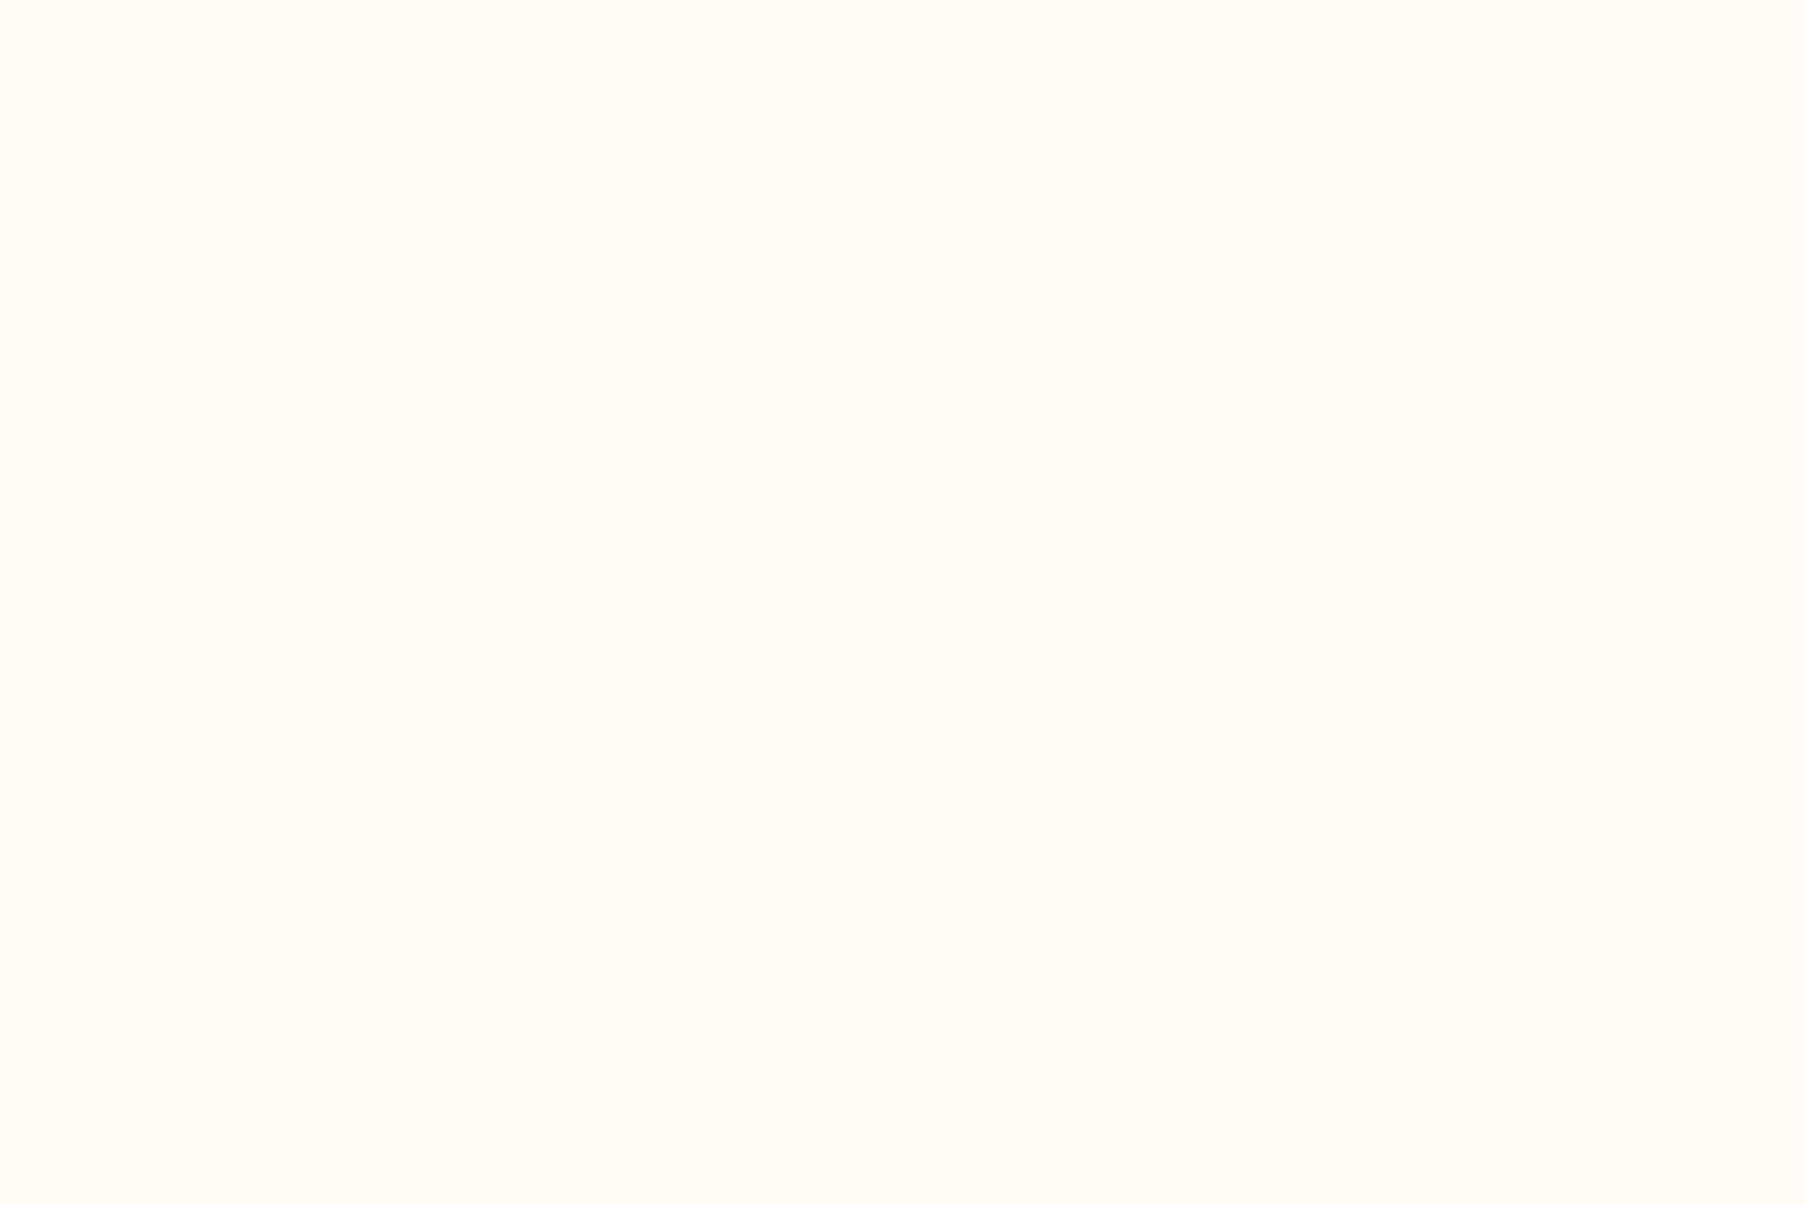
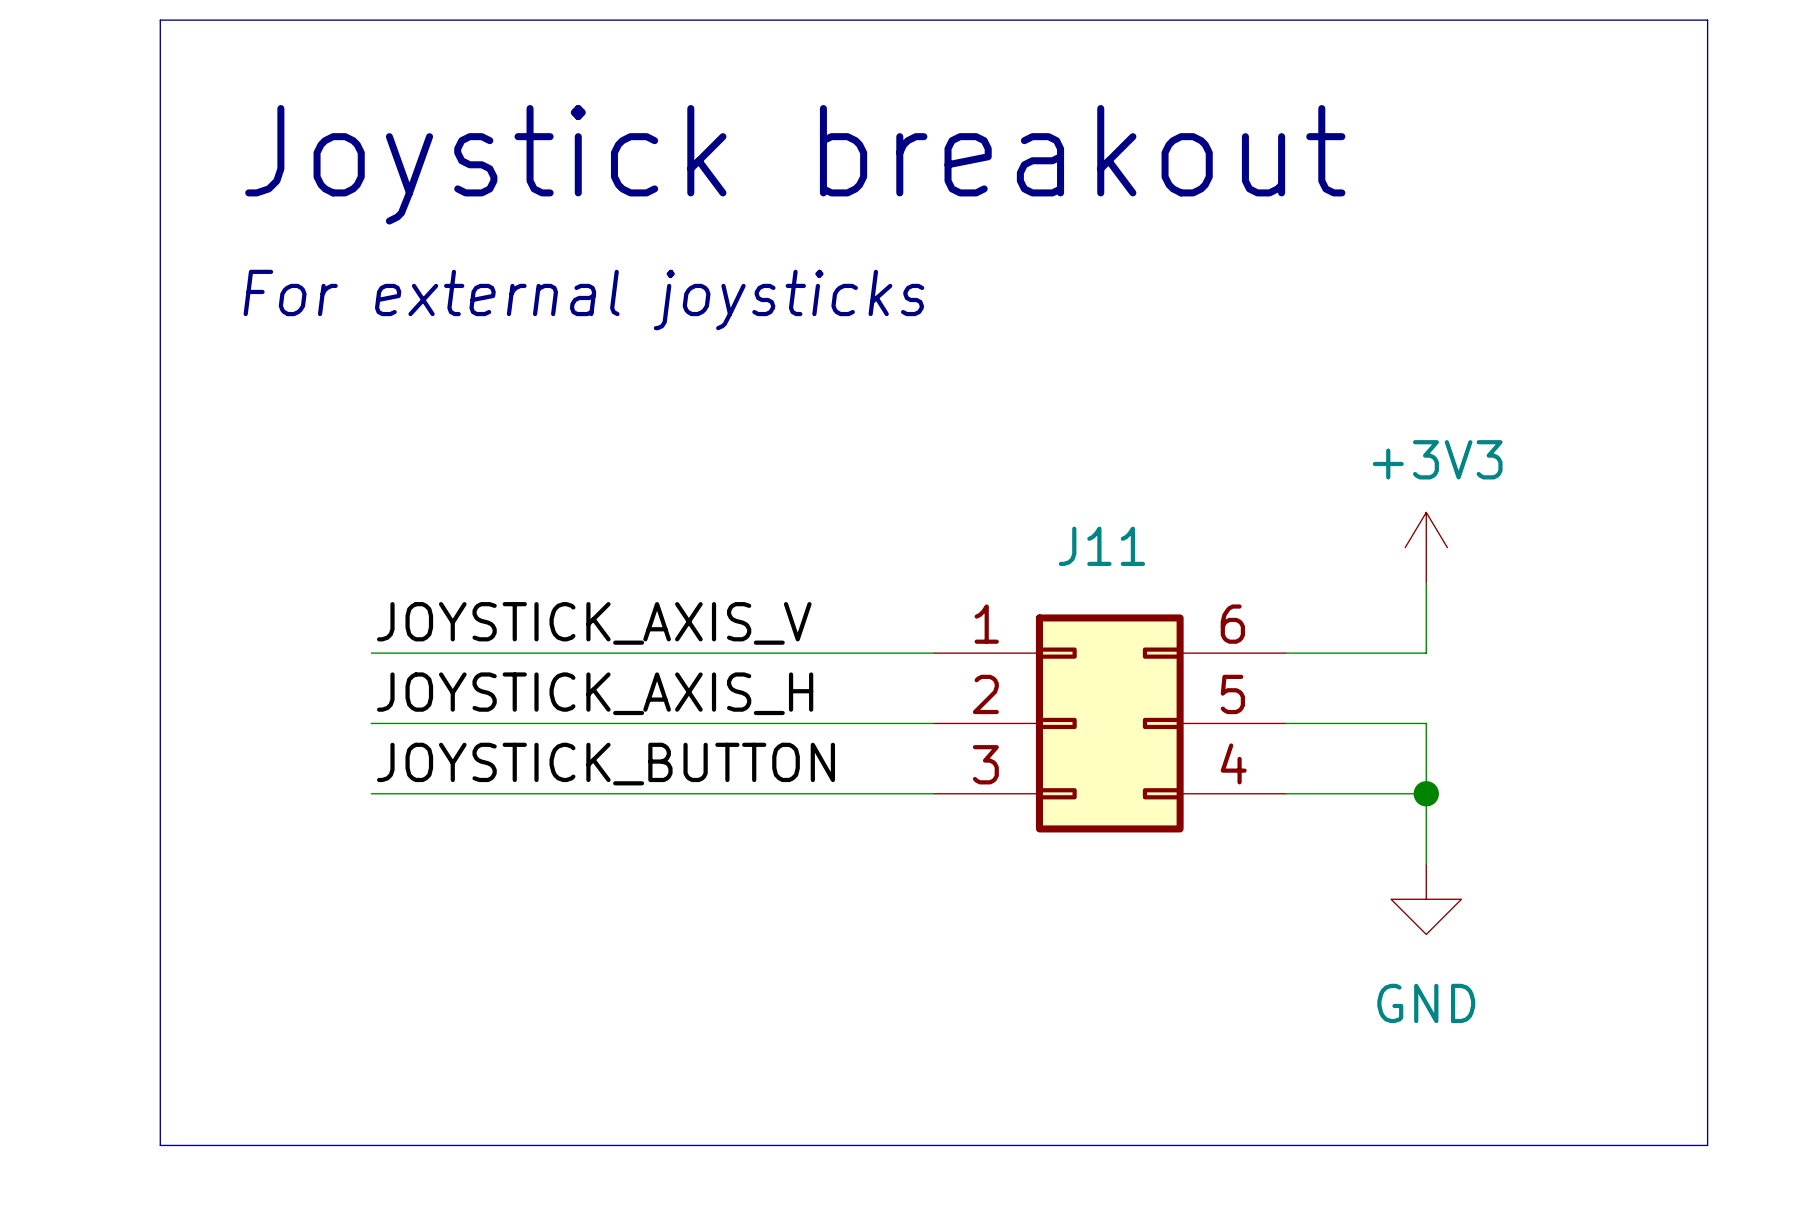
line: none -> (160, 20) (1707, 20) (1707, 1145) (160, 1145) (160, 20)
text: none -> Joystick breakout (795, 164)
text: none -> For external joysticks (583, 299)
power symbol: none -> +3V3 (1426, 547)
wire: none -> (1426, 582) (1426, 653) (1285, 653)
label: none -> JOYSTICK_AXIS_V (594, 623)
wire: none -> (371, 653) (933, 653)
label: none -> JOYSTICK_AXIS_H (595, 693)
wire: none -> (371, 723) (933, 723)
J11: none -> (1109, 723)
wire: none -> (1285, 723) (1426, 723) (1426, 864)
label: none -> JOYSTICK_BUTTON (606, 764)
wire: none -> (371, 793) (933, 793)
wire: none -> (1285, 793) (1426, 793)
junction: none -> (1426, 793)
power symbol: none -> GND (1426, 899)

